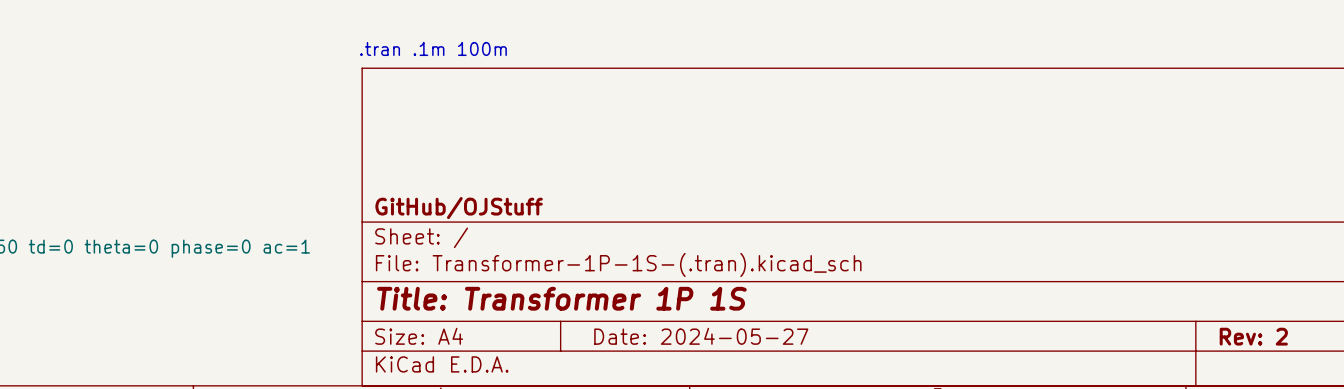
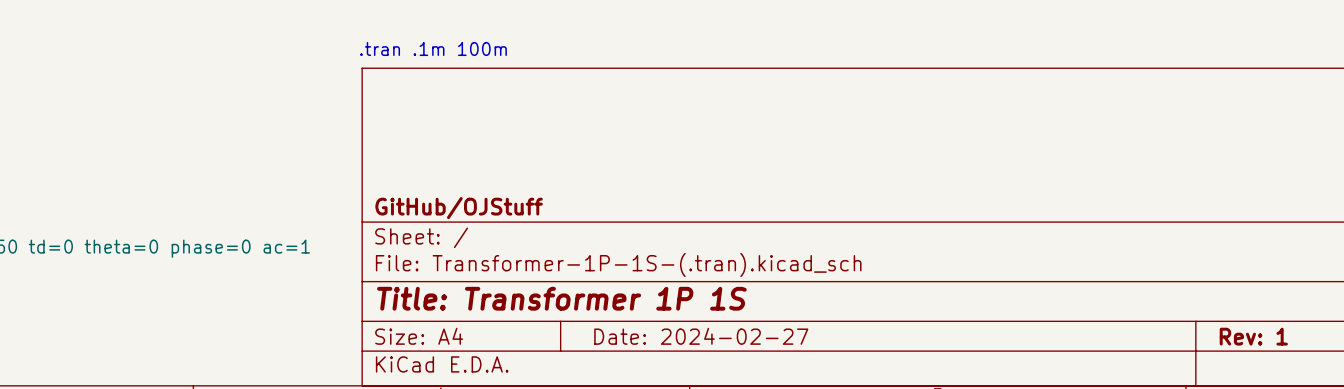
title block: Date: 2024-05-27 (701, 336) -> Date: 2024-02-27 (701, 336)
title block: Rev: 2 (1253, 336) -> Rev: 1 (1253, 336)

